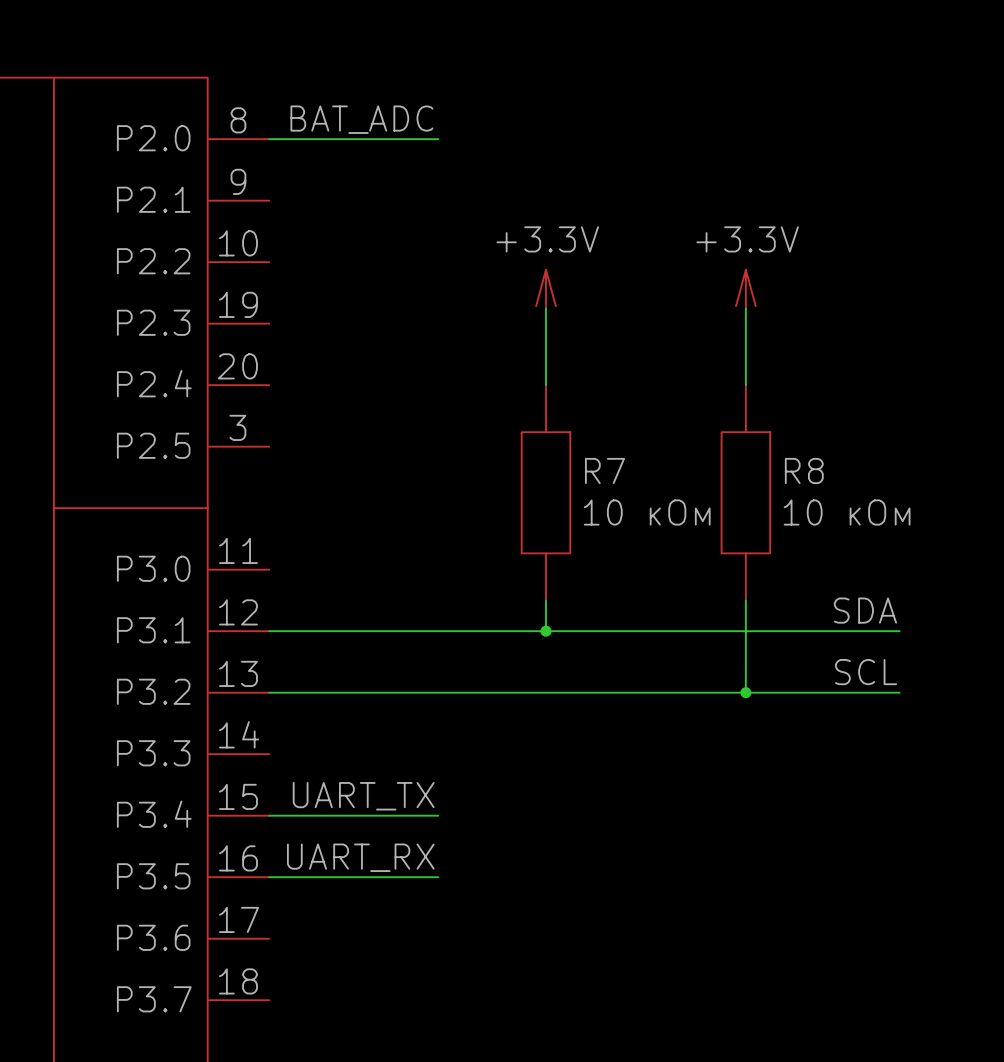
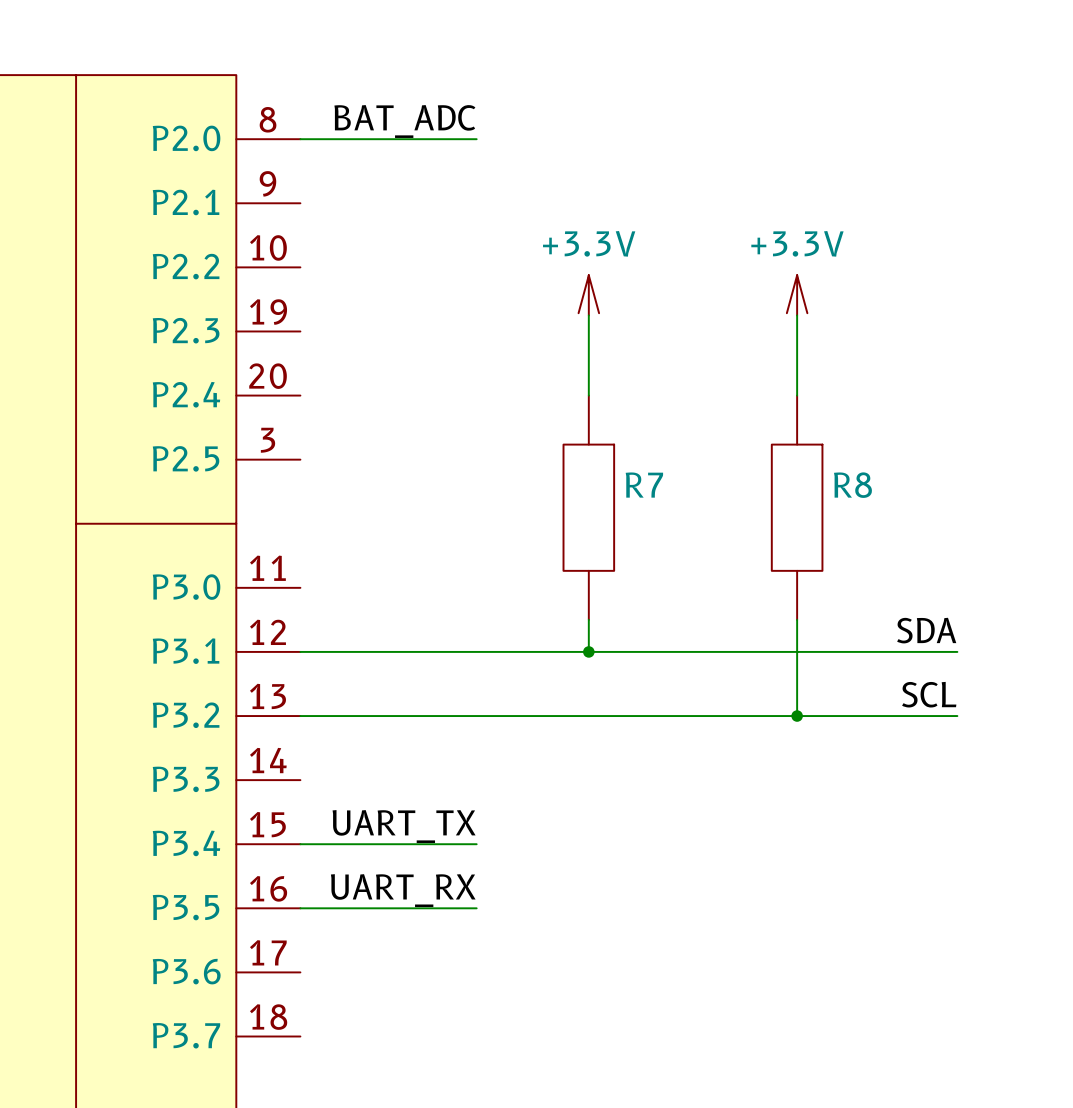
R7 value: 10 кОм (647, 512) -> none
R8 value: 10 кОм (847, 512) -> none

